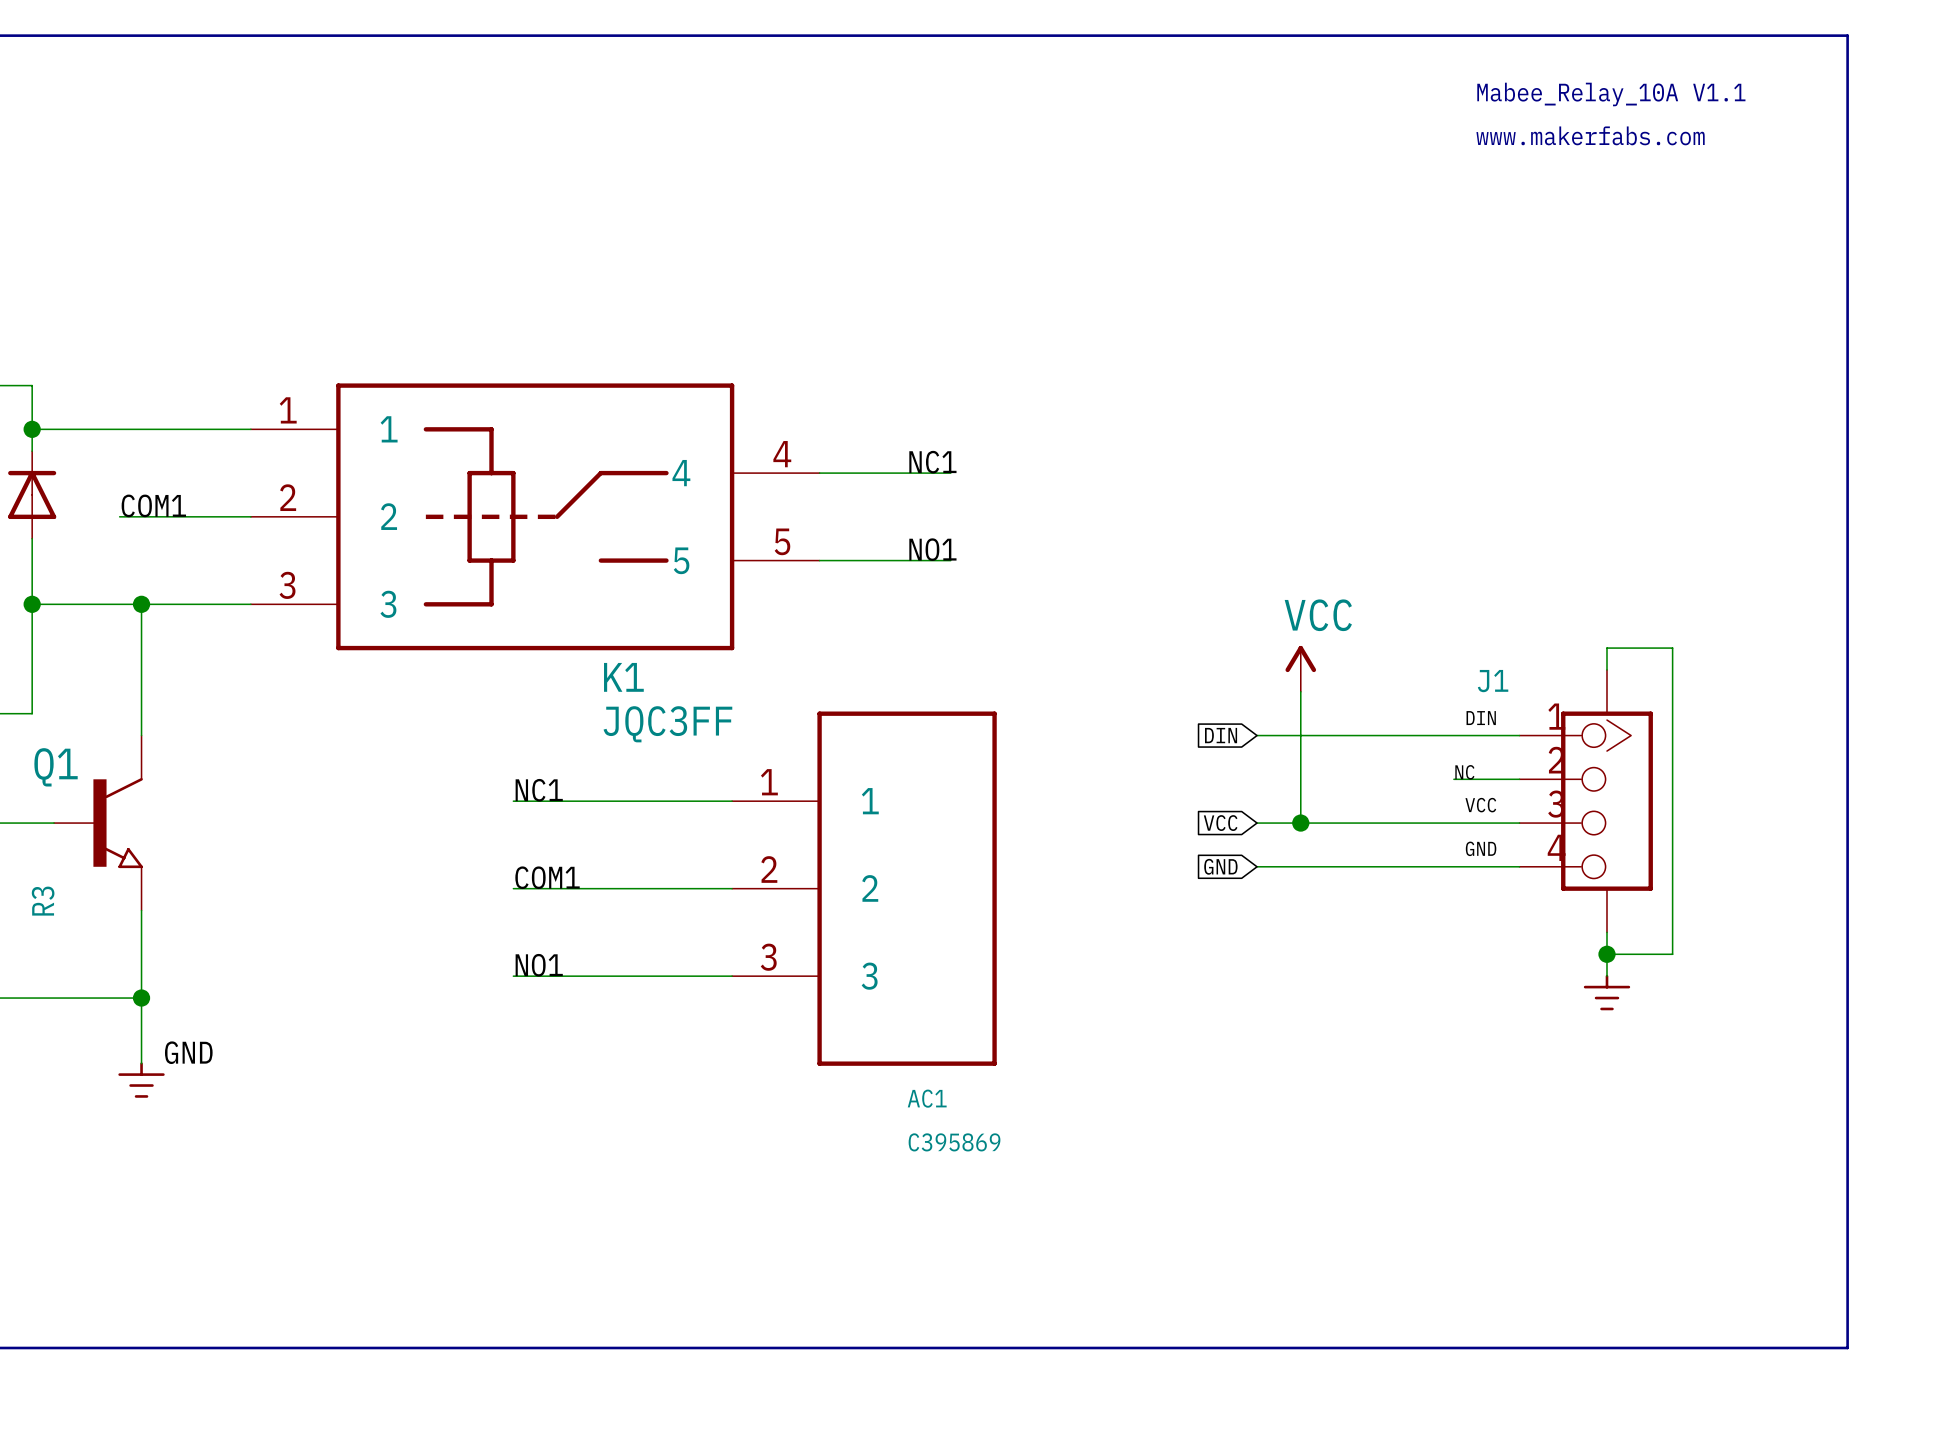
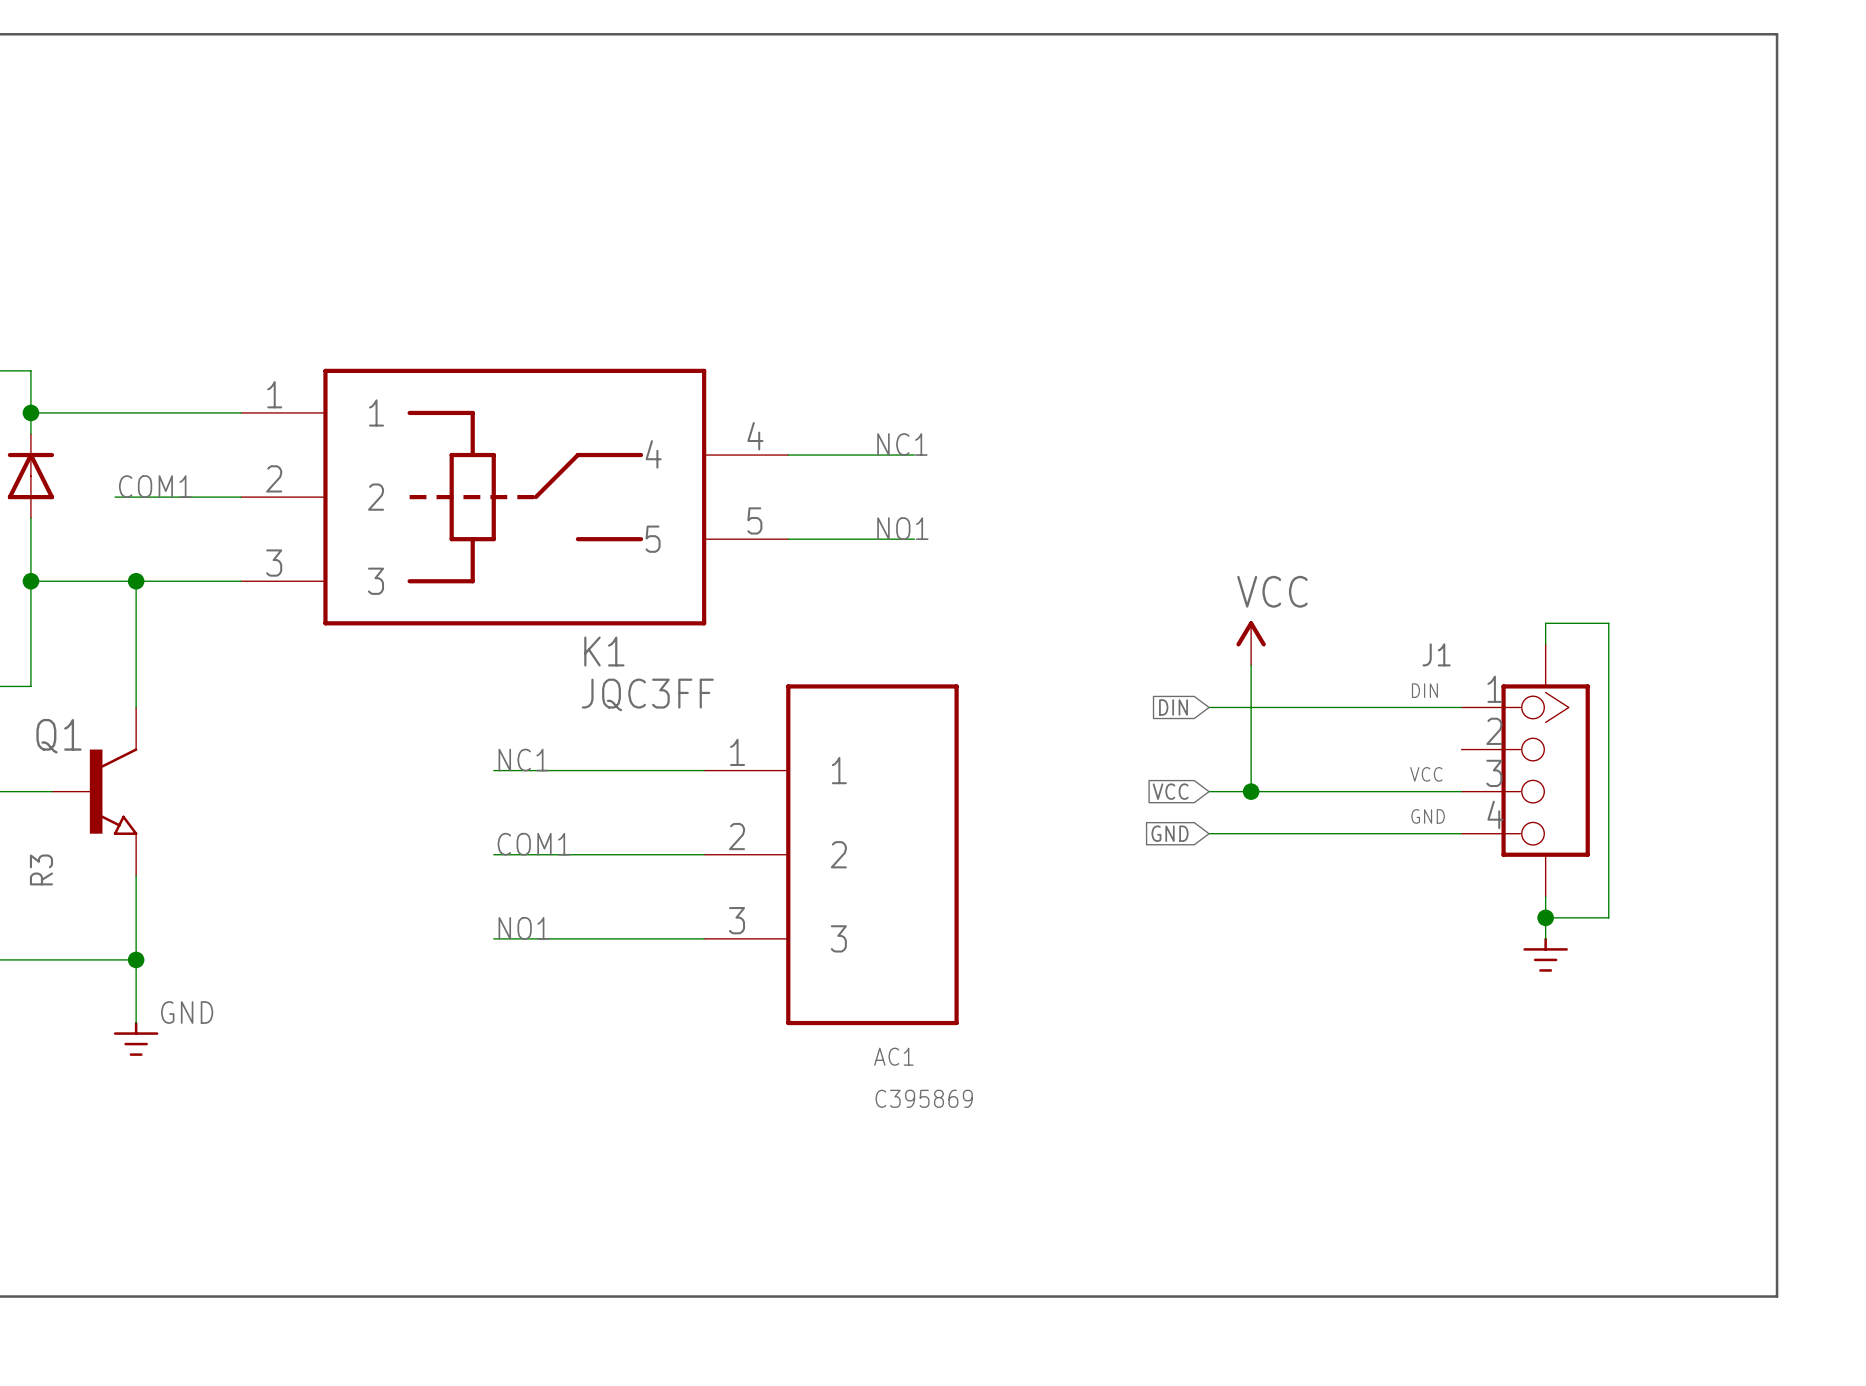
text: Mabee_Relay_10A V1.1 (1611, 94) -> none
text: www.makerfabs.com (1590, 135) -> none
label: NC (1464, 772) -> none
wire: (1453, 779) (1519, 779) -> none

